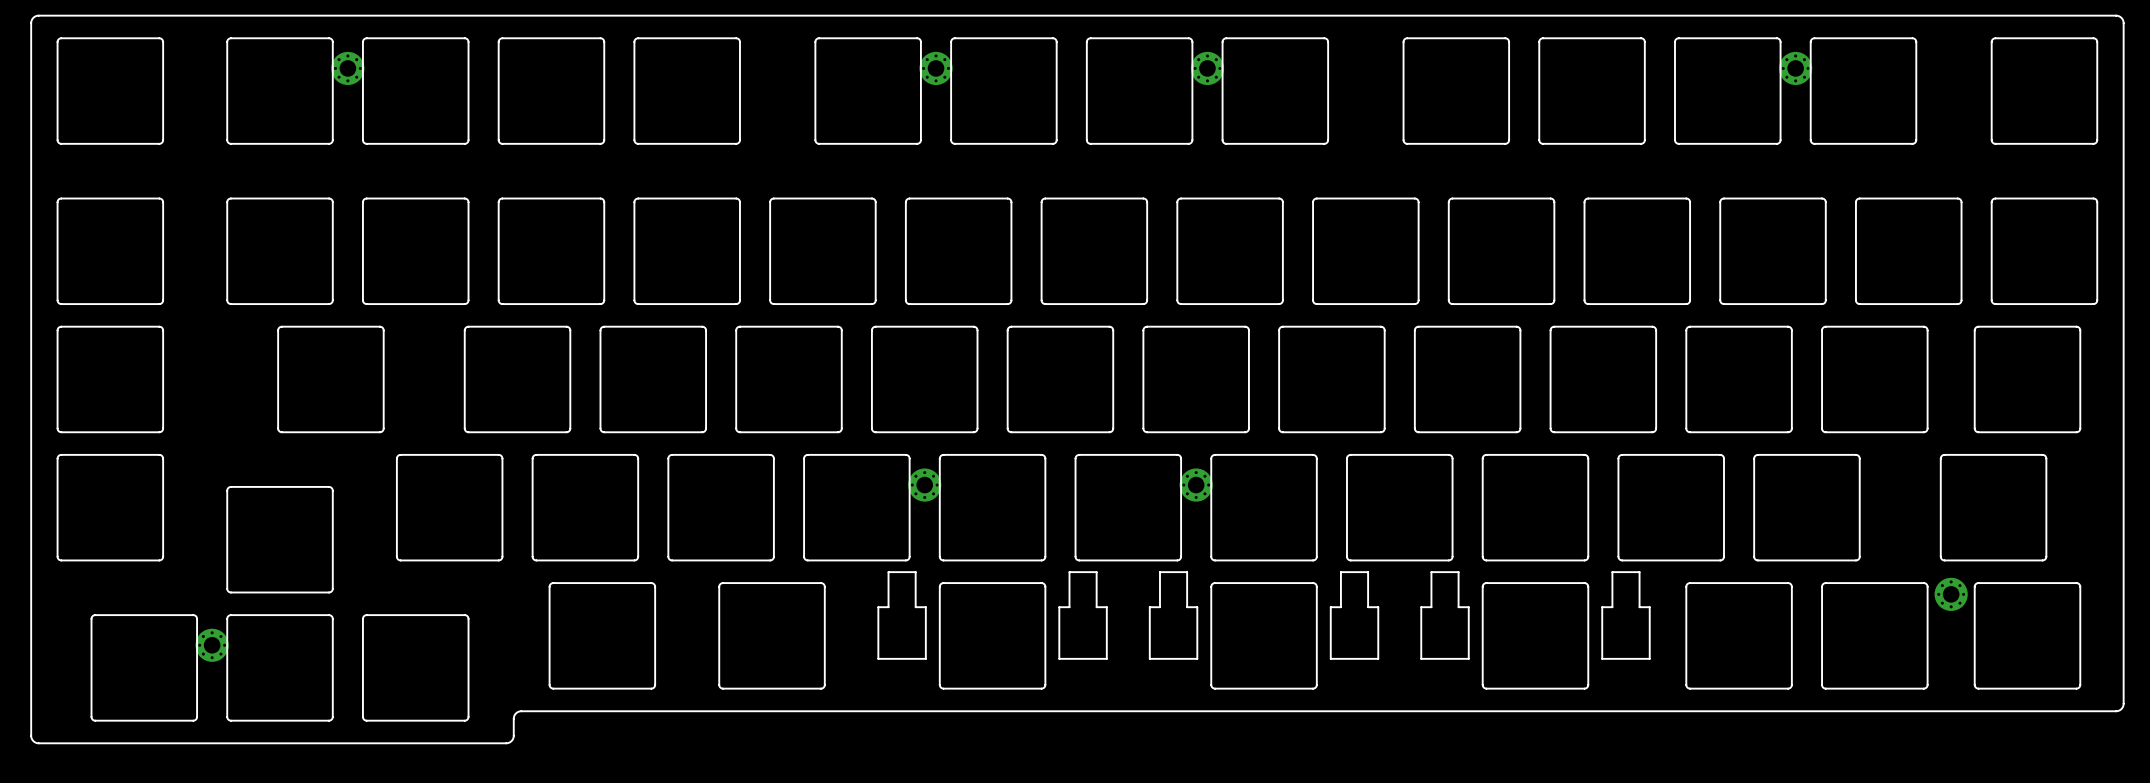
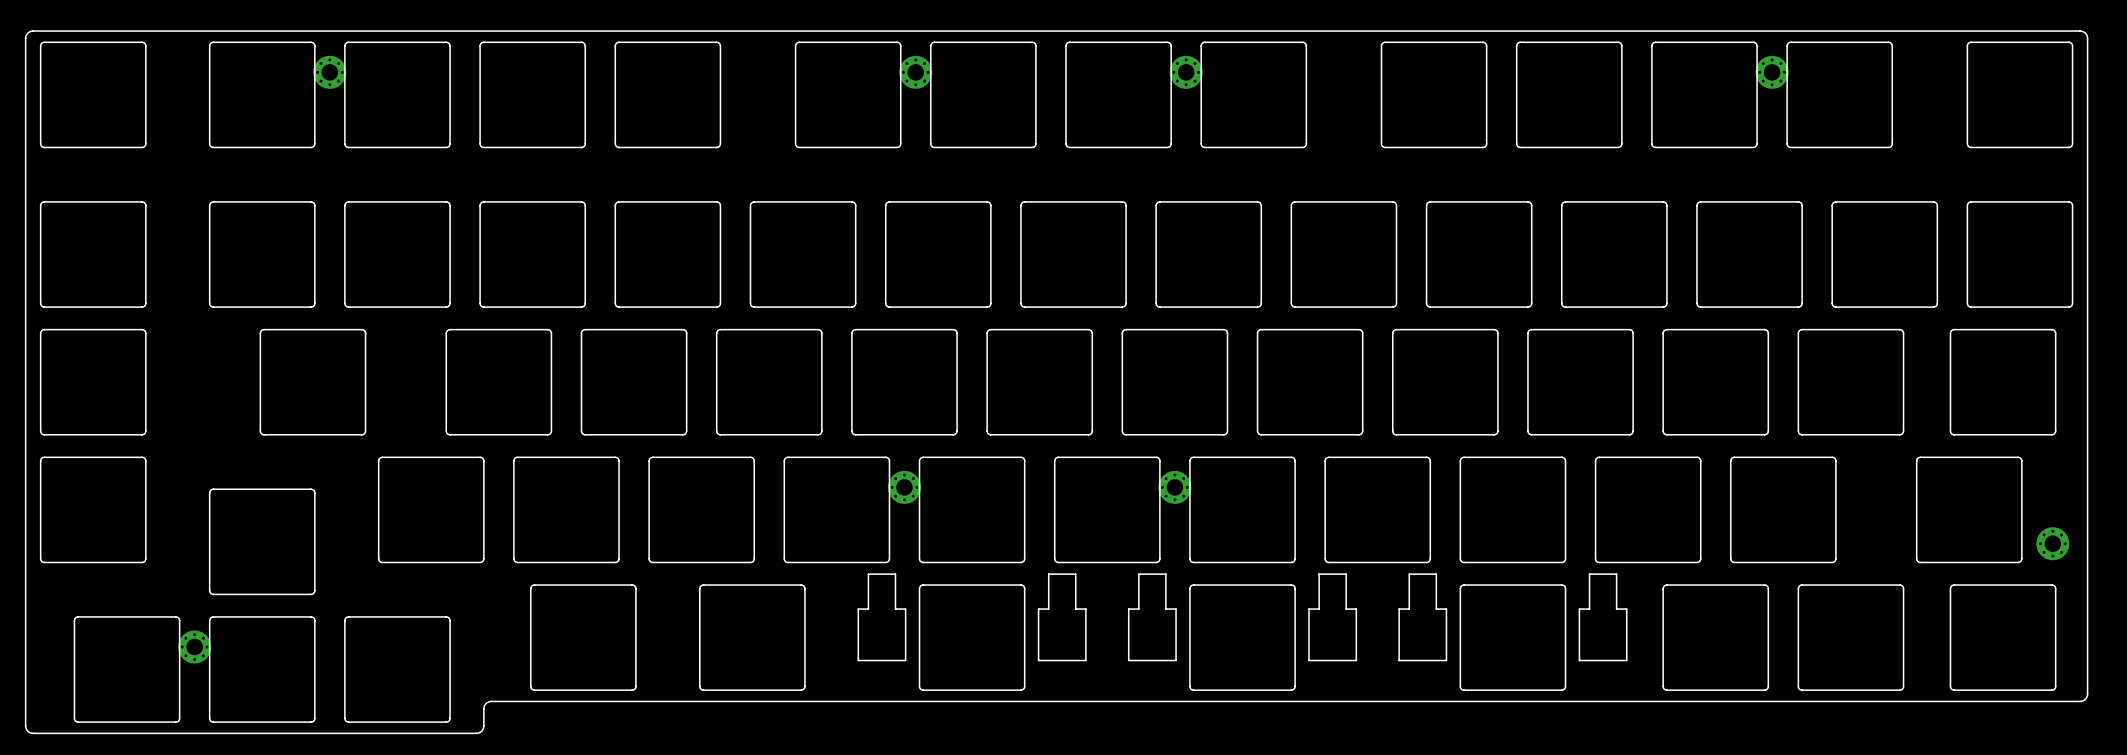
board edge: (2116, 15) (35, 16) (31, 23) (31, 738) (38, 743) (506, 743) (513, 738) (514, 716) (516, 712) (521, 711) (2118, 710) (2123, 703) (2123, 23) (2121, 17) (2116, 15) -> (2080, 31) (2085, 33) (2087, 38) (2087, 693) (2082, 701) (491, 701) (484, 705) (483, 727) (477, 733) (33, 733) (26, 728) (25, 38) (30, 31) (2080, 31)
part position: (1951, 594) -> (2052, 543)

